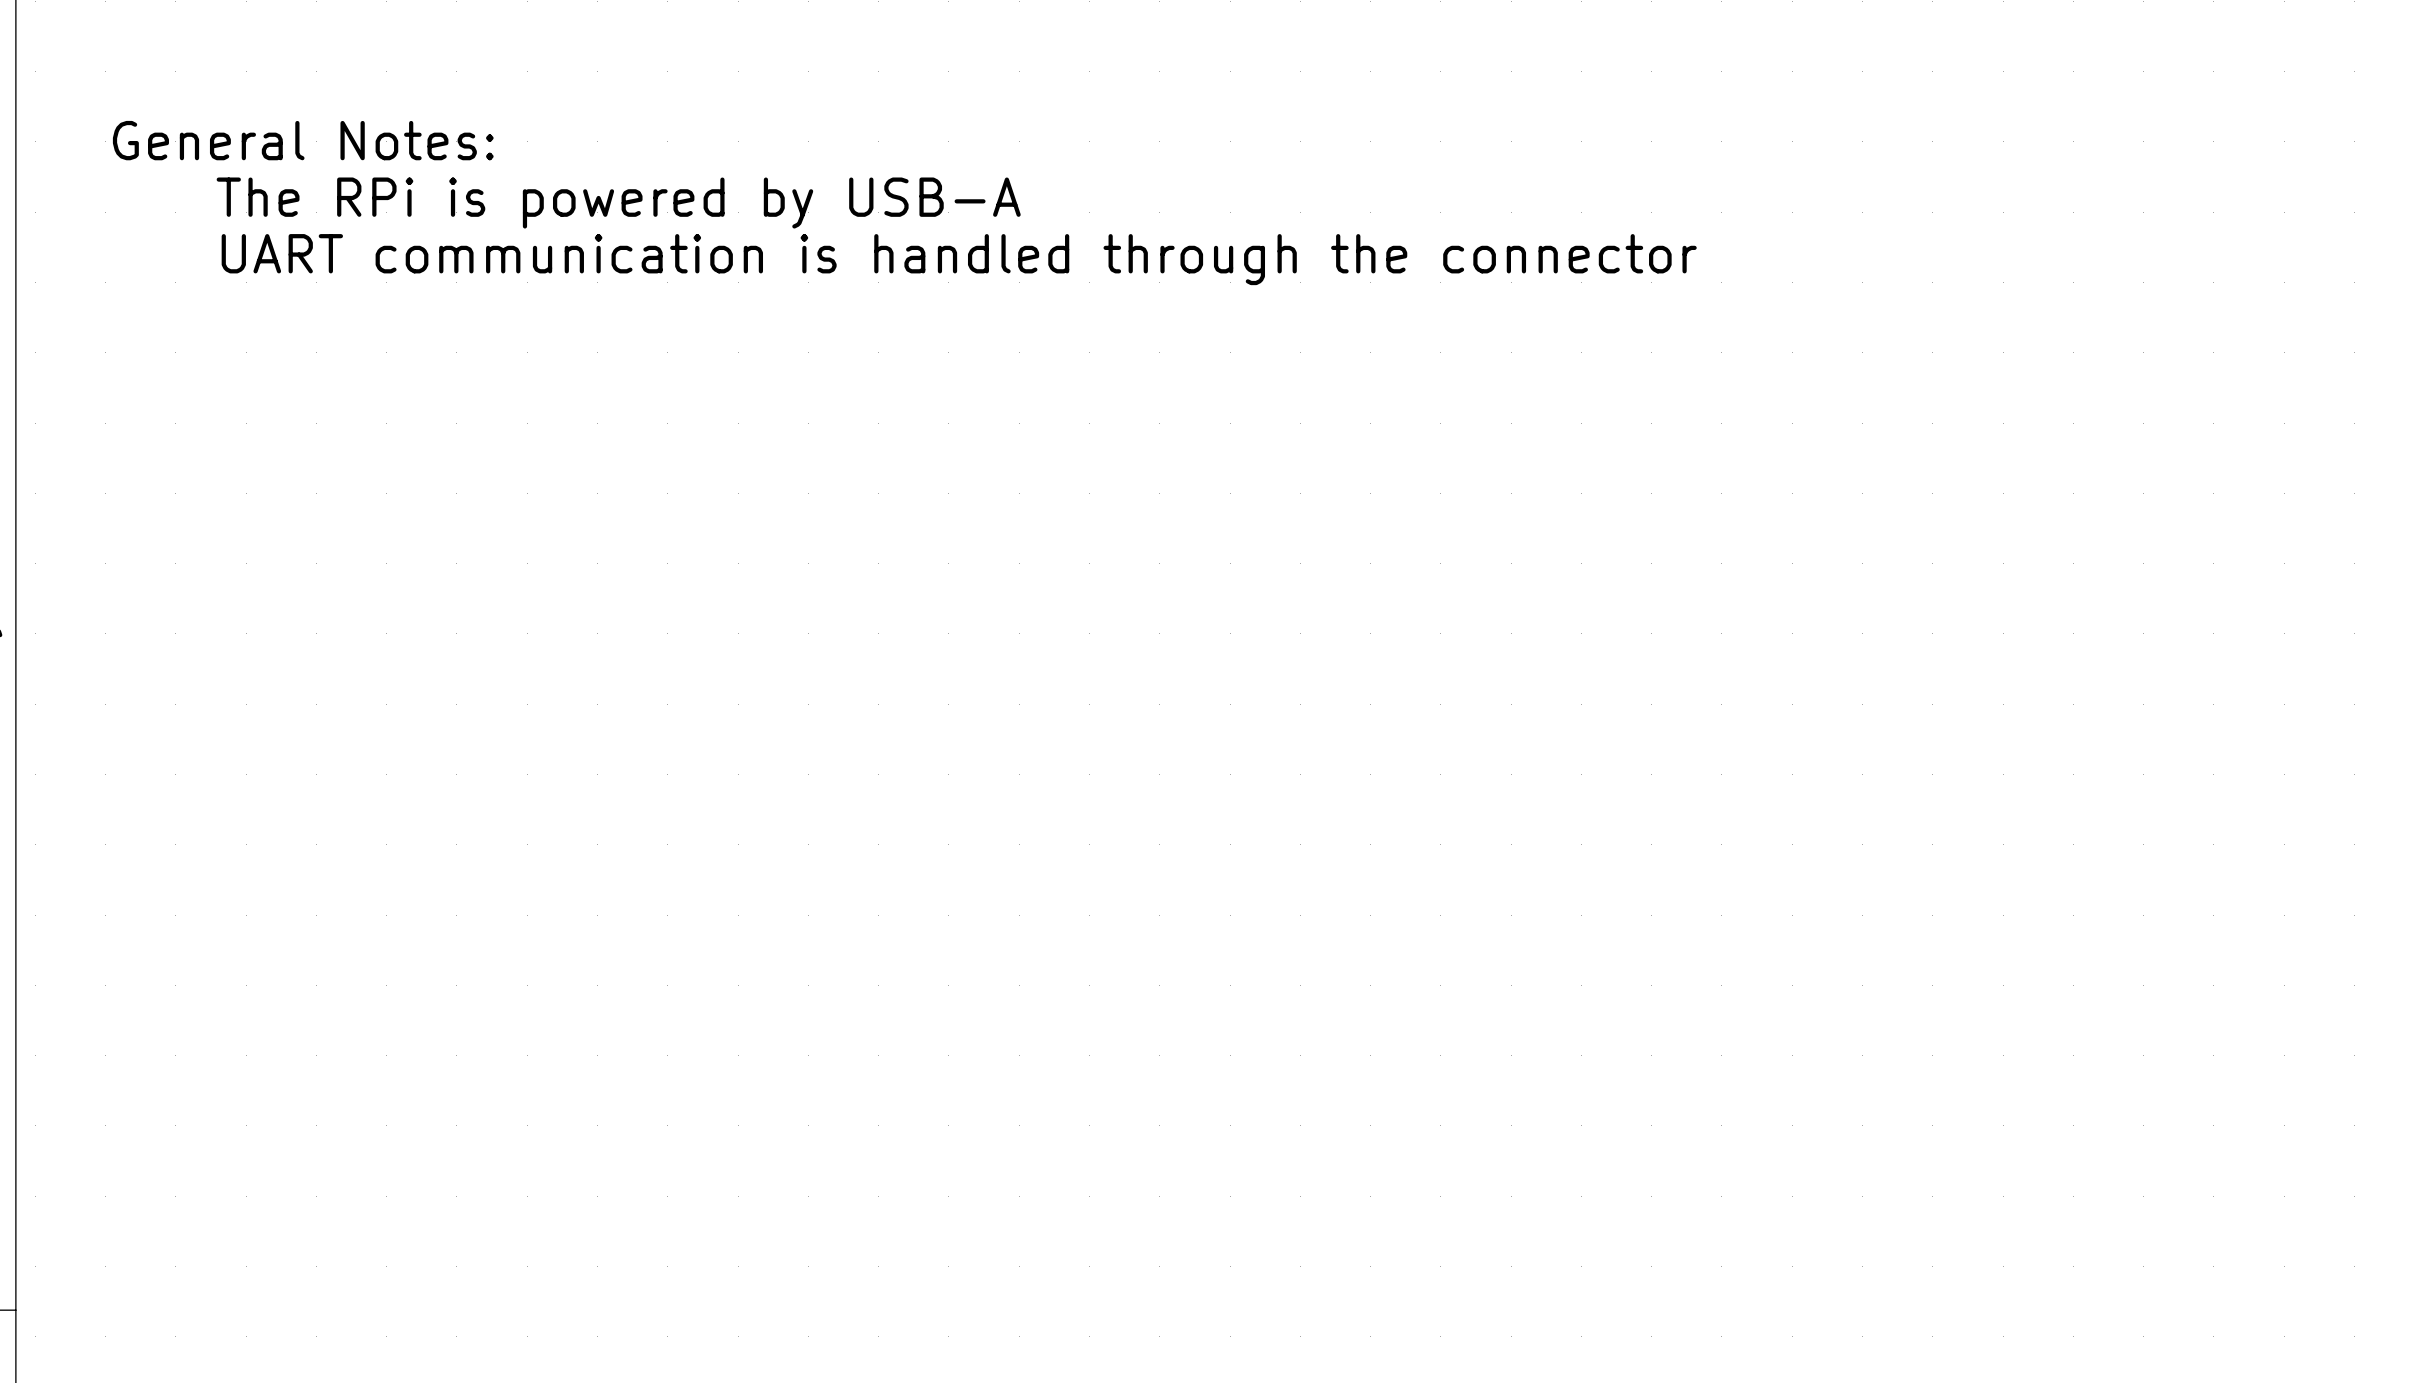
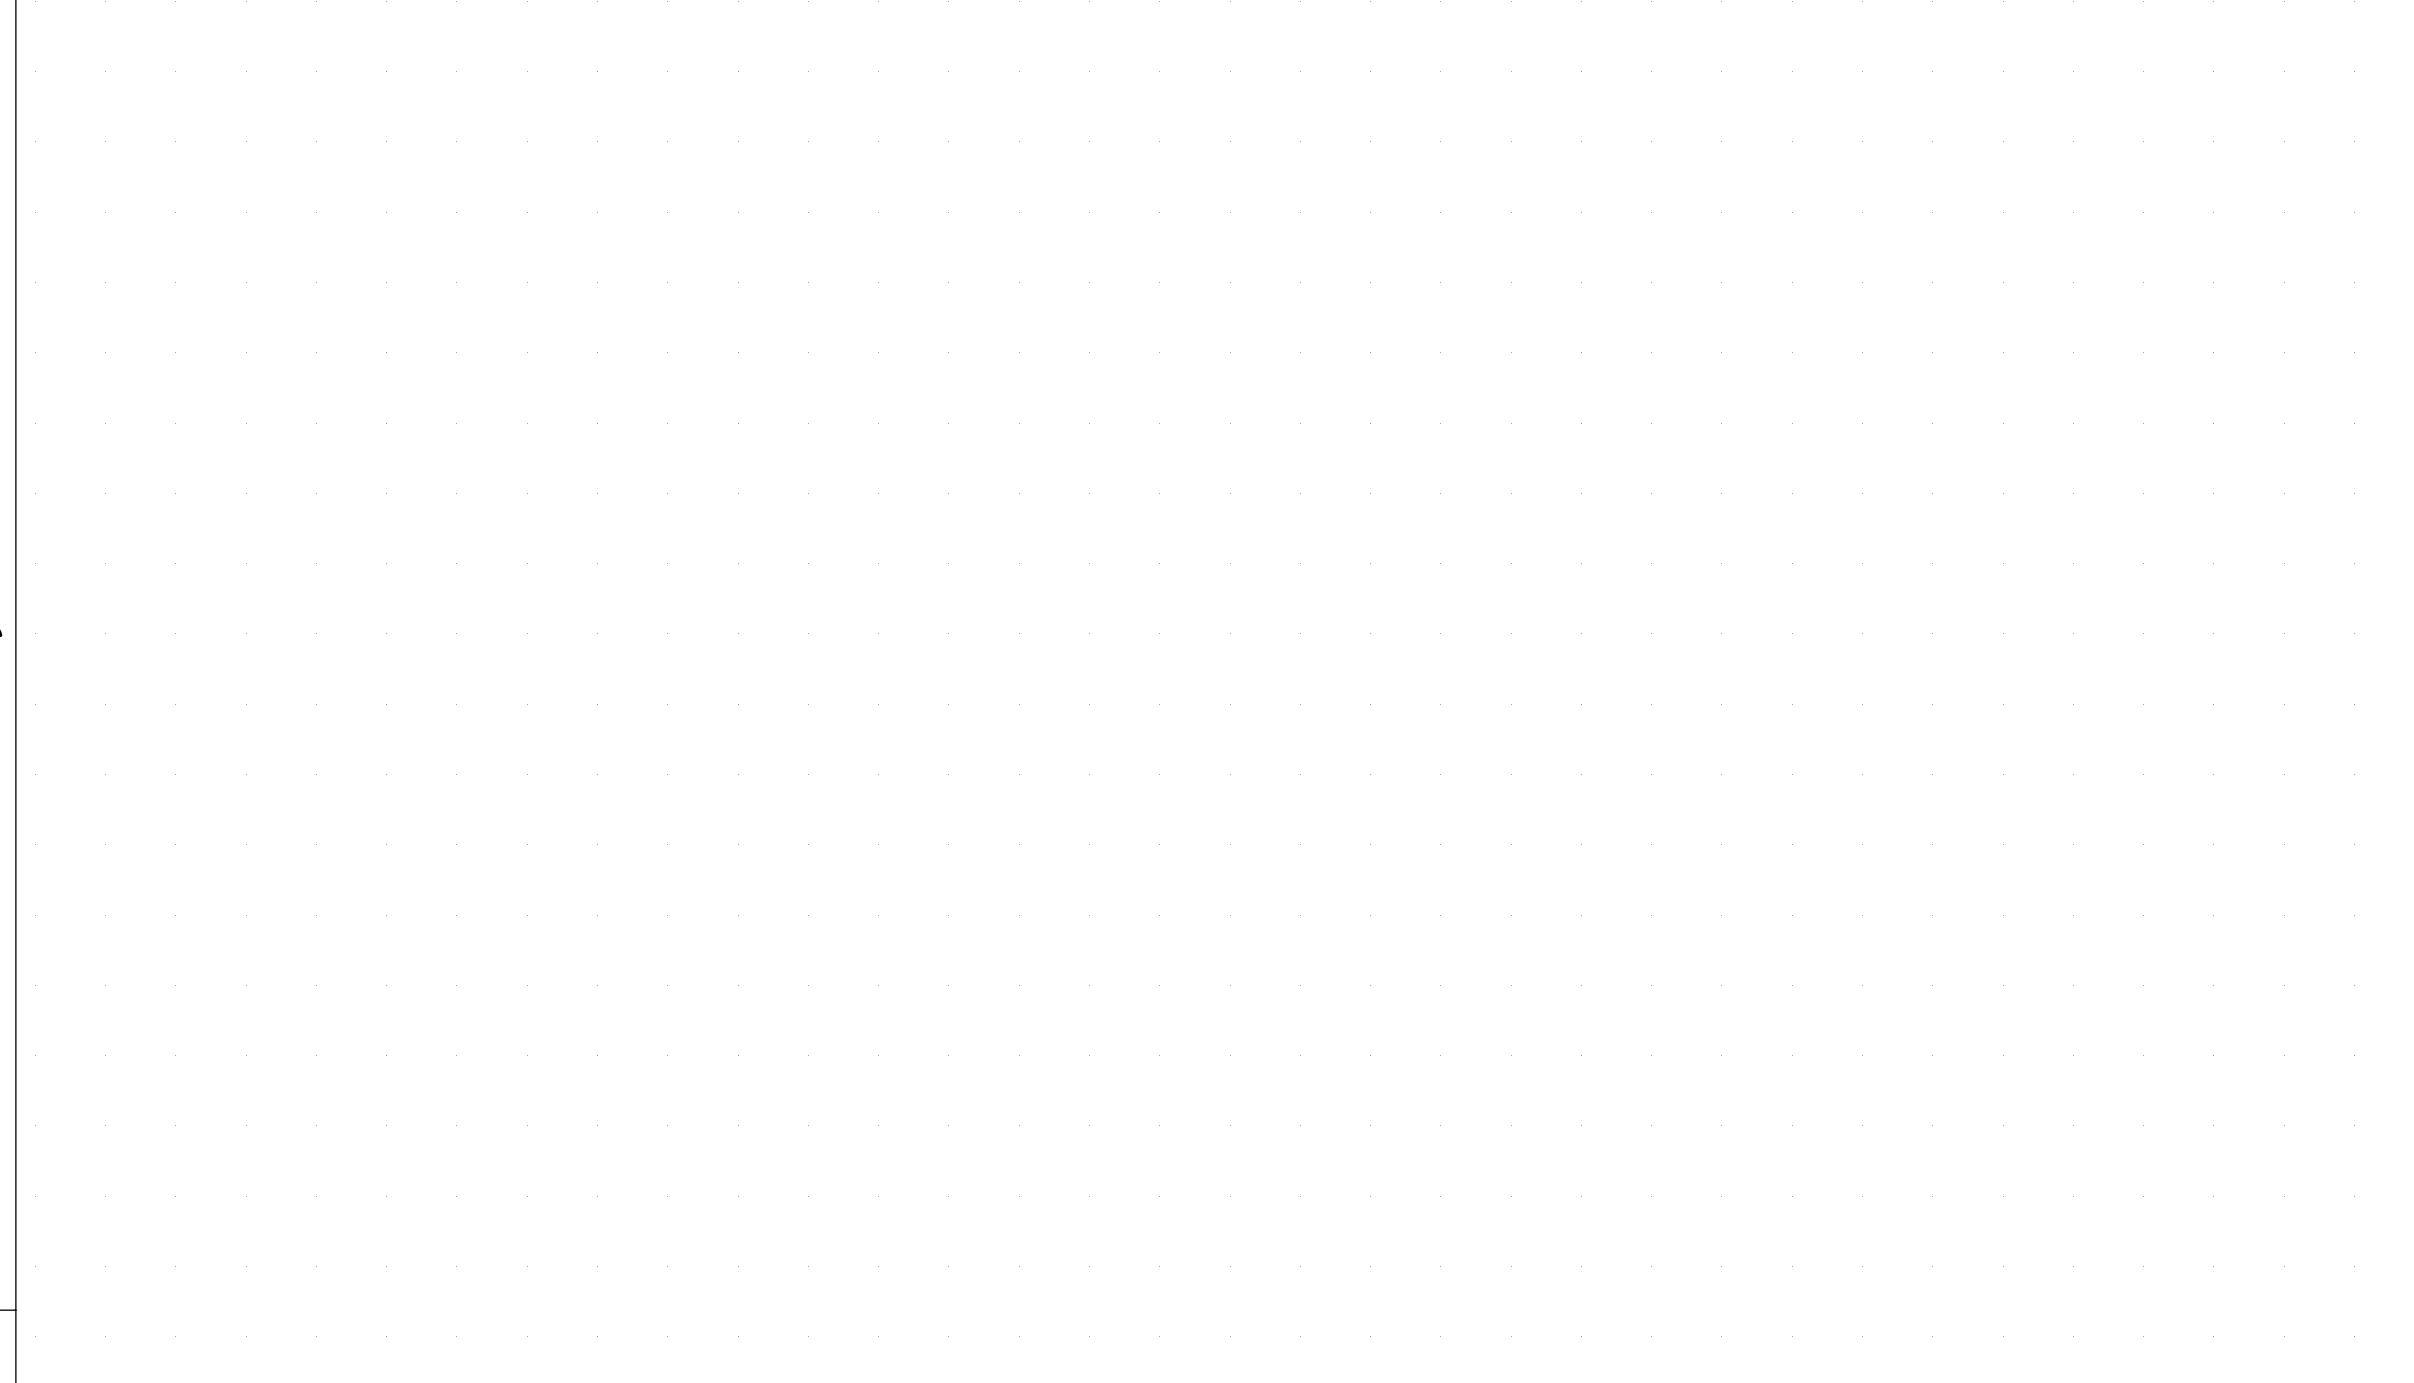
text: General Notes: (303, 140) -> none
text: The RPi is powered by USB-A (618, 203) -> none
text: UART communication is handled through the connector (959, 259) -> none

